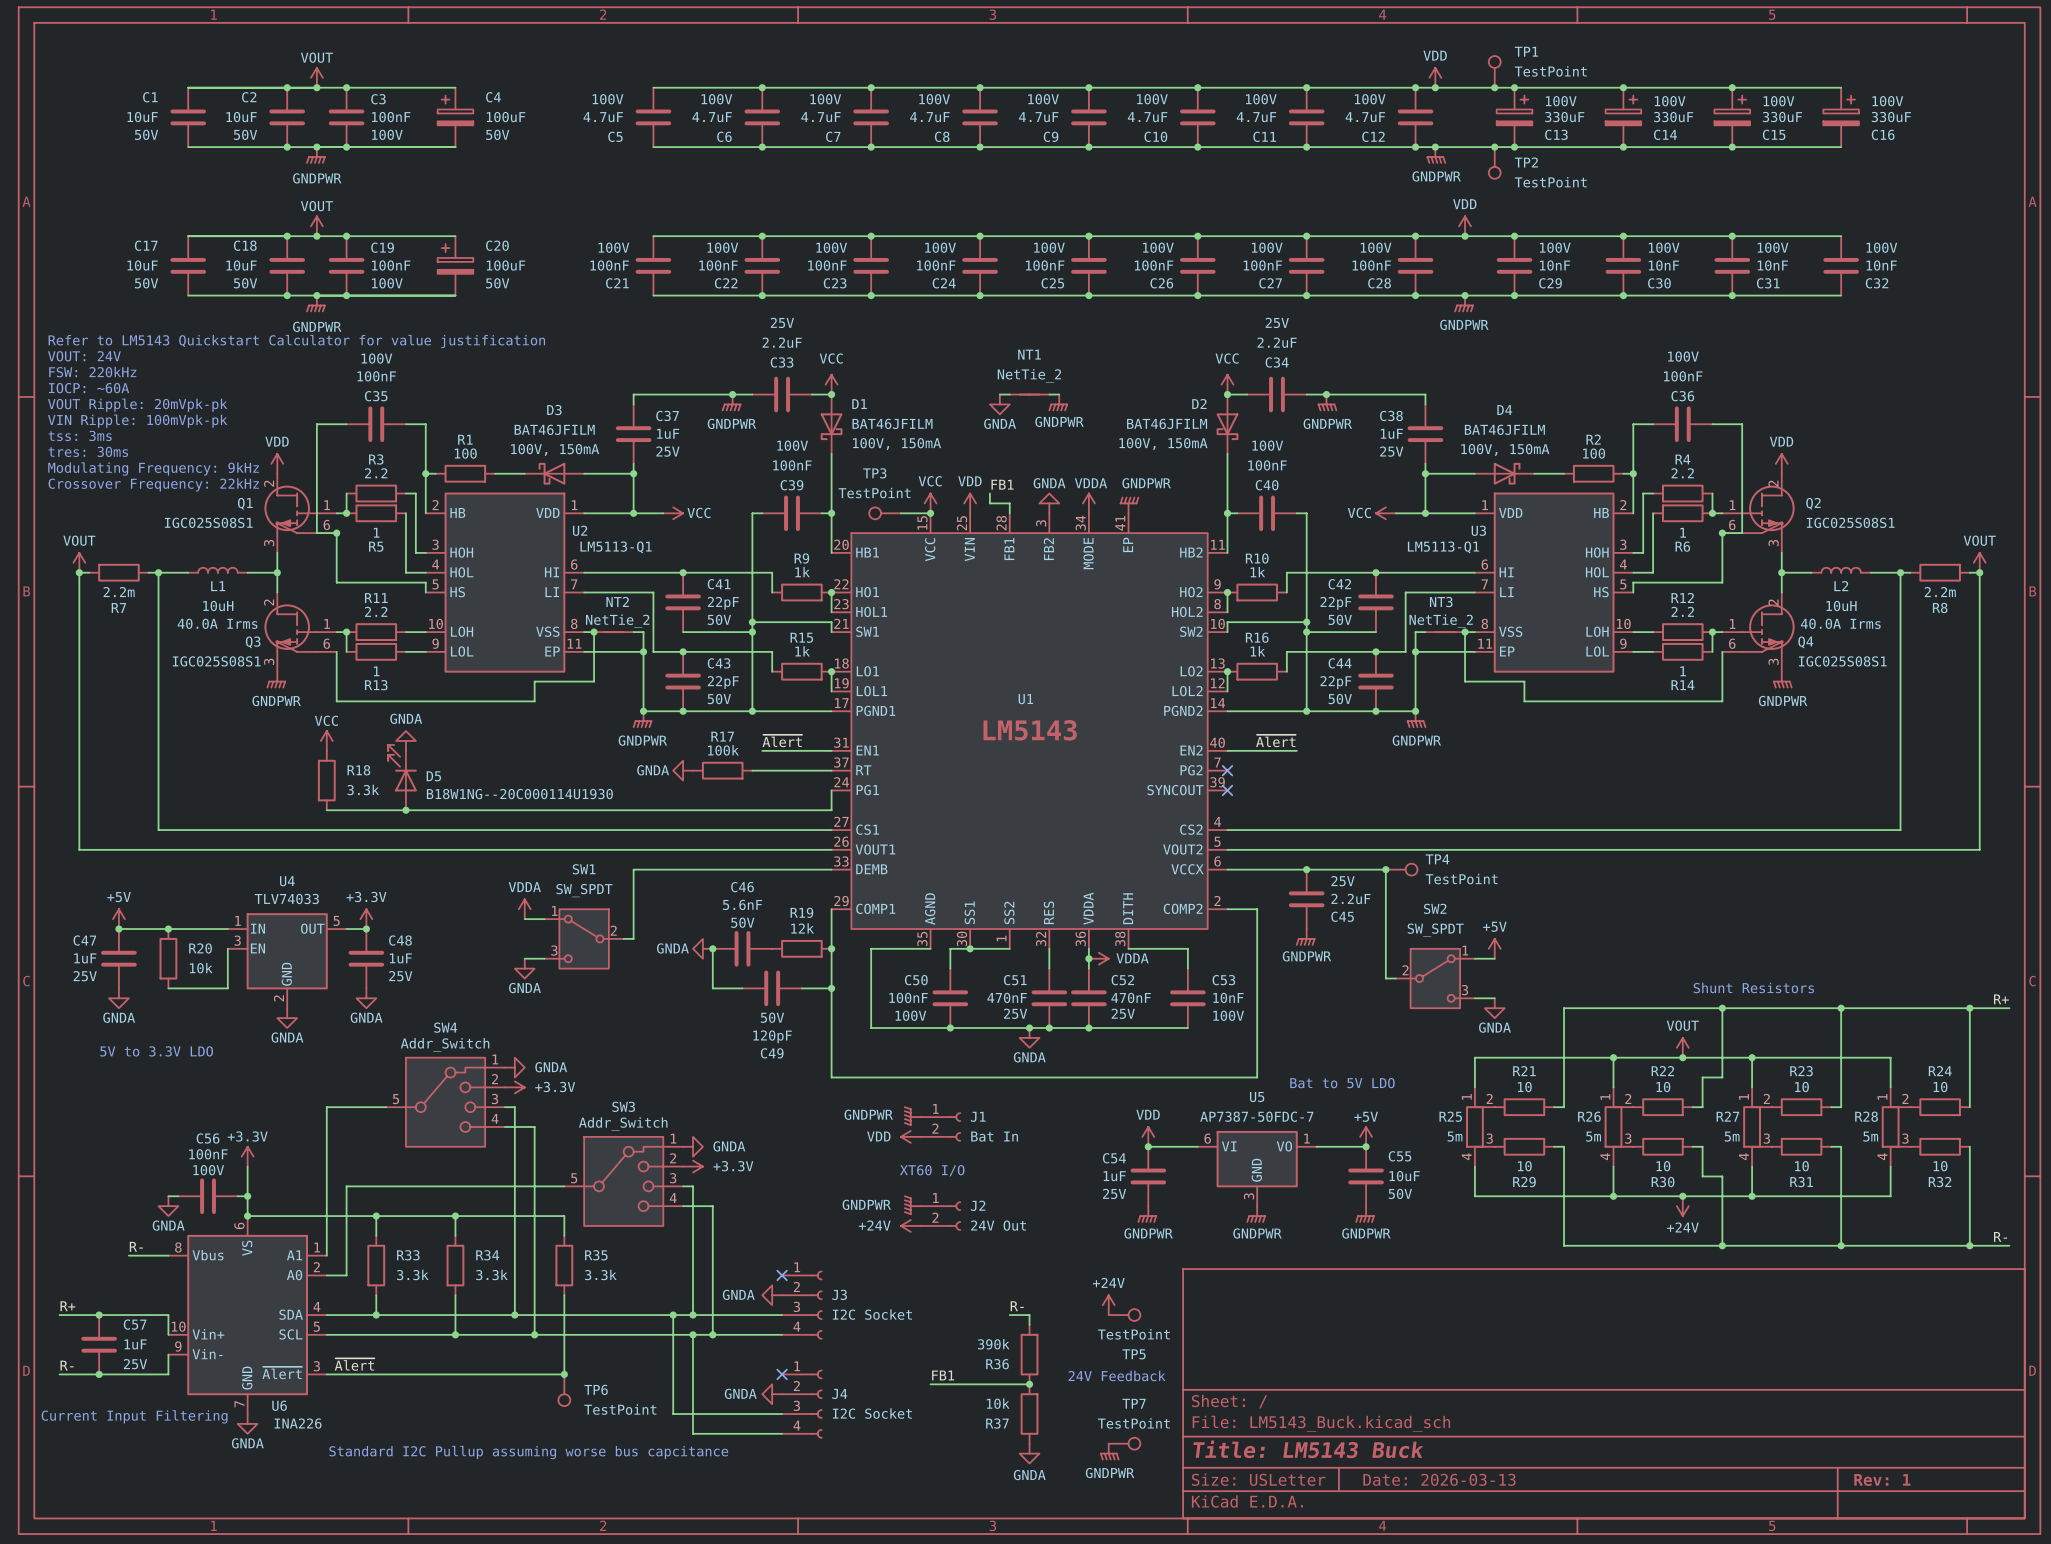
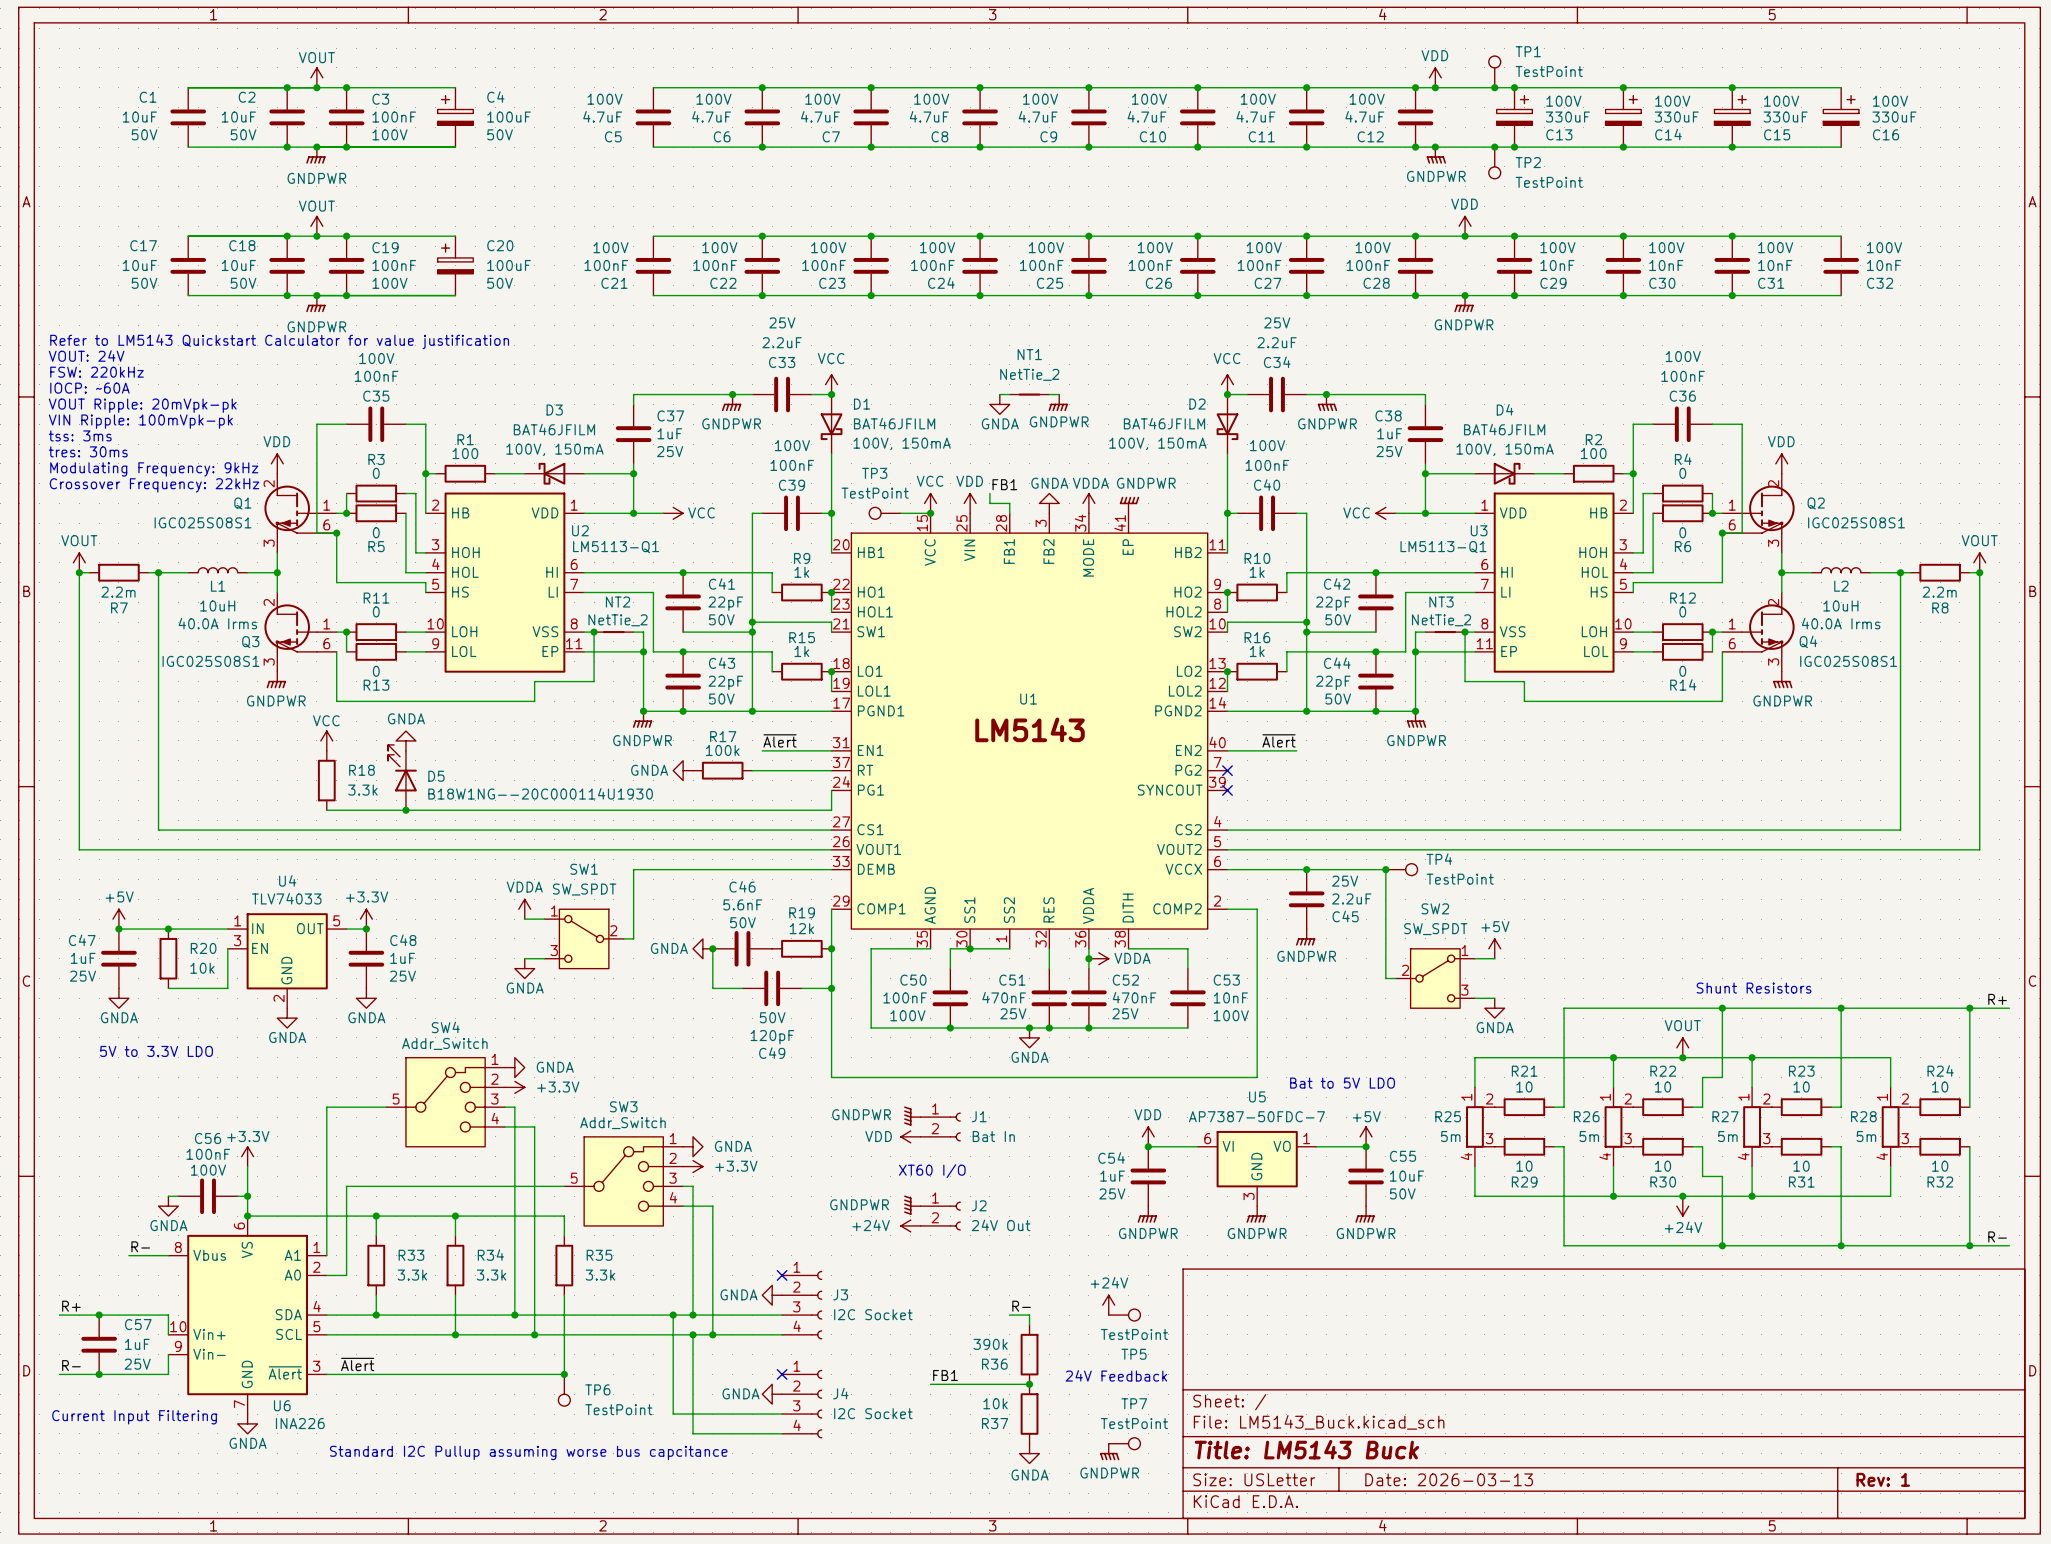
R3 value: 2.2 (376, 473) -> 0 (376, 473)
R4 value: 2.2 (1682, 473) -> 0 (1682, 473)
R5 value: 1 (376, 532) -> 0 (376, 532)
R6 value: 1 (1683, 532) -> 0 (1682, 532)
R11 value: 2.2 (376, 611) -> 0 (376, 611)
R12 value: 2.2 (1682, 611) -> 0 (1682, 611)
R13 value: 1 (376, 671) -> 0 (376, 671)
R14 value: 1 (1683, 671) -> 0 (1682, 671)

